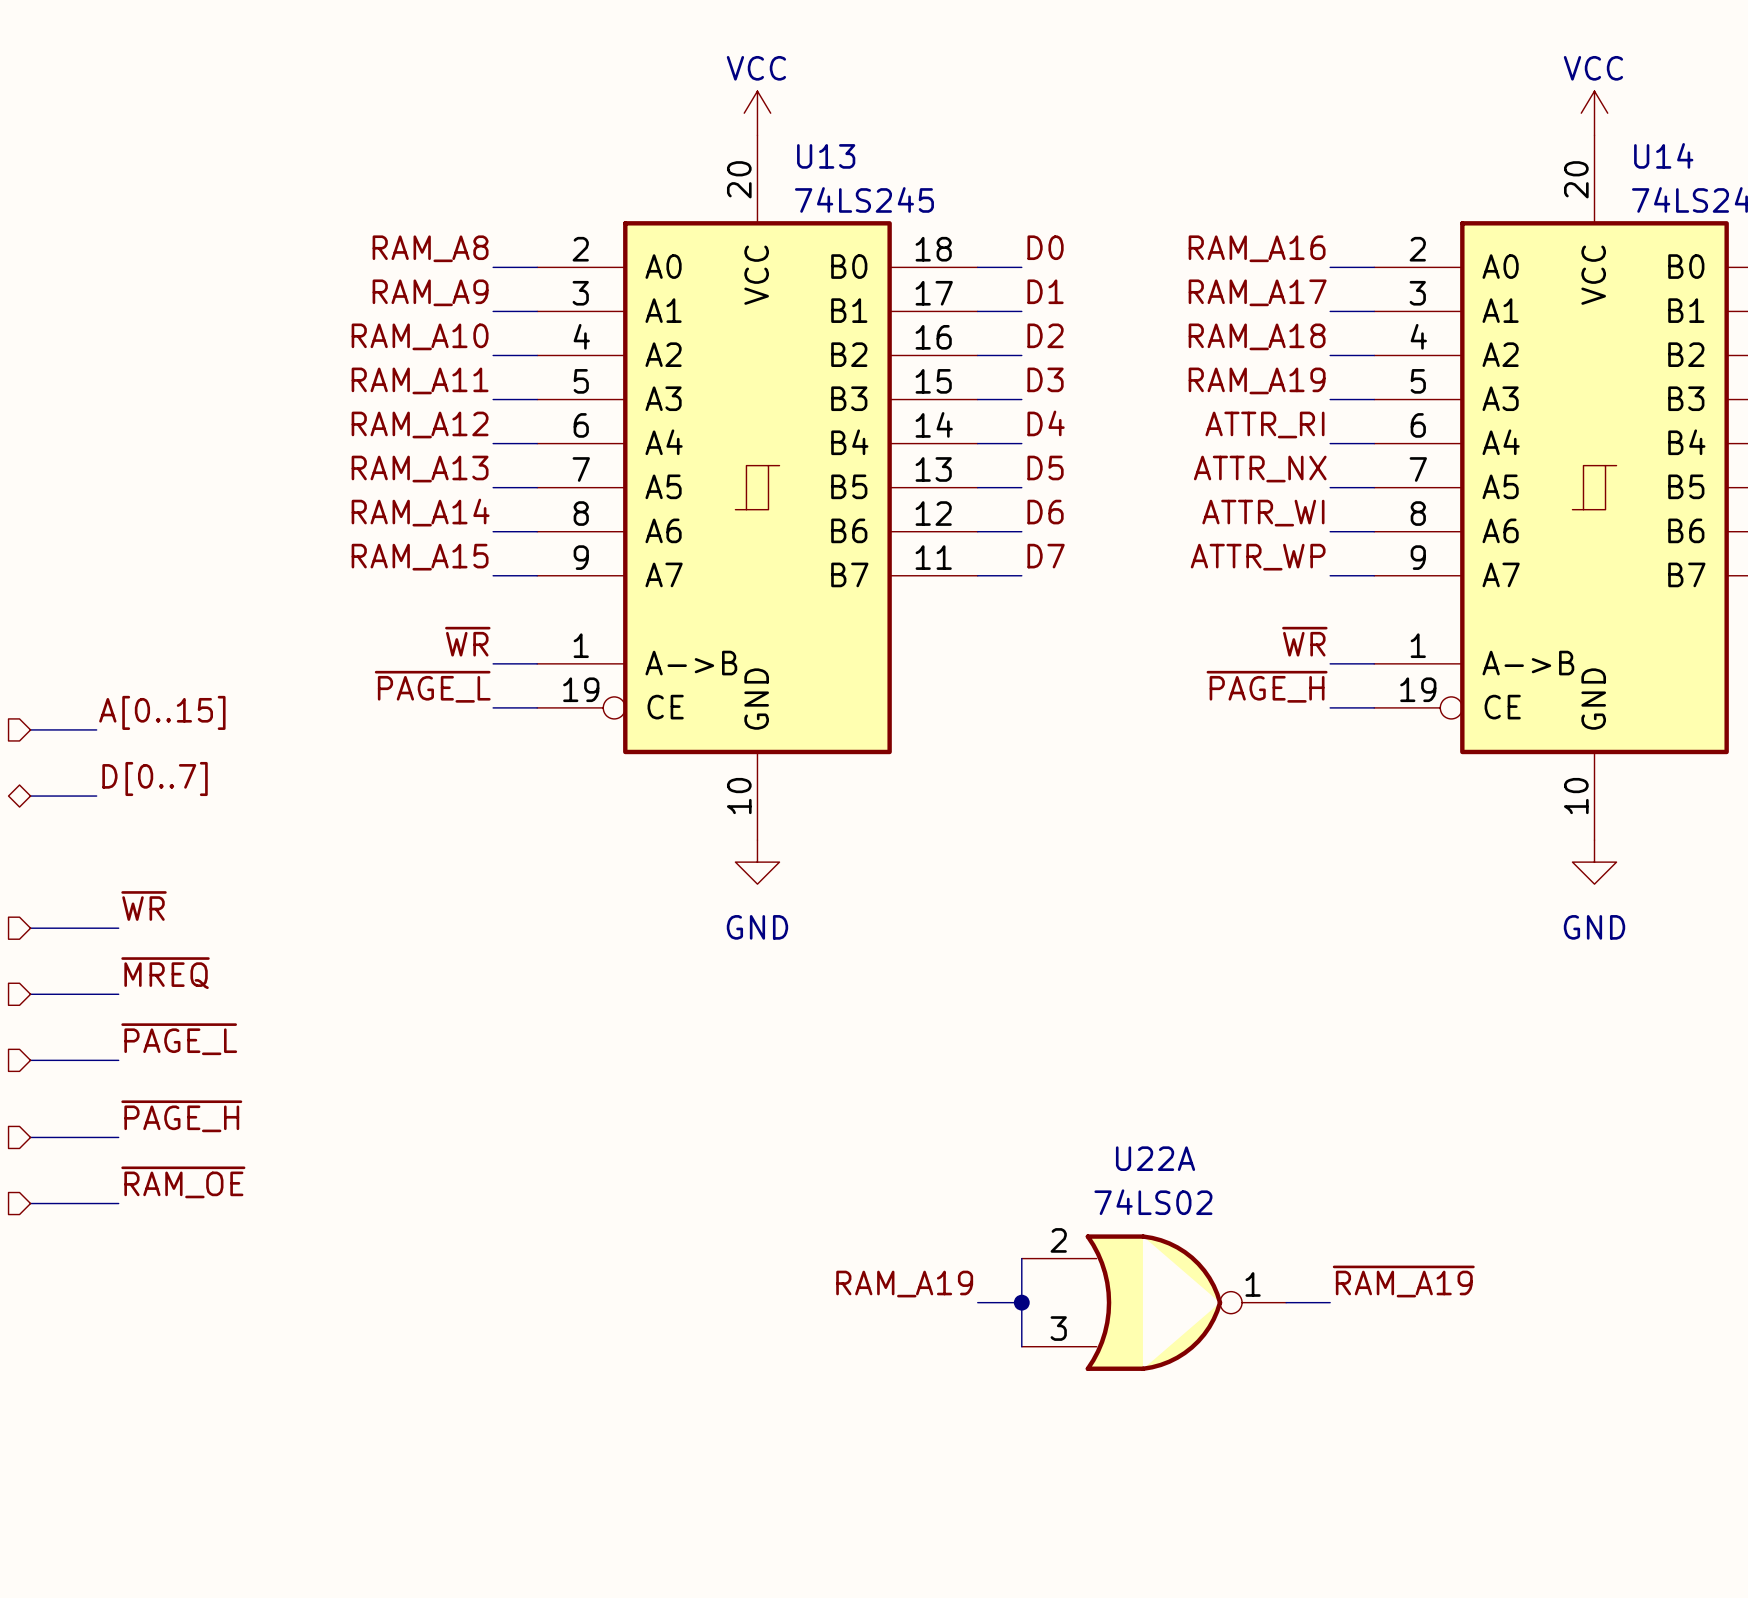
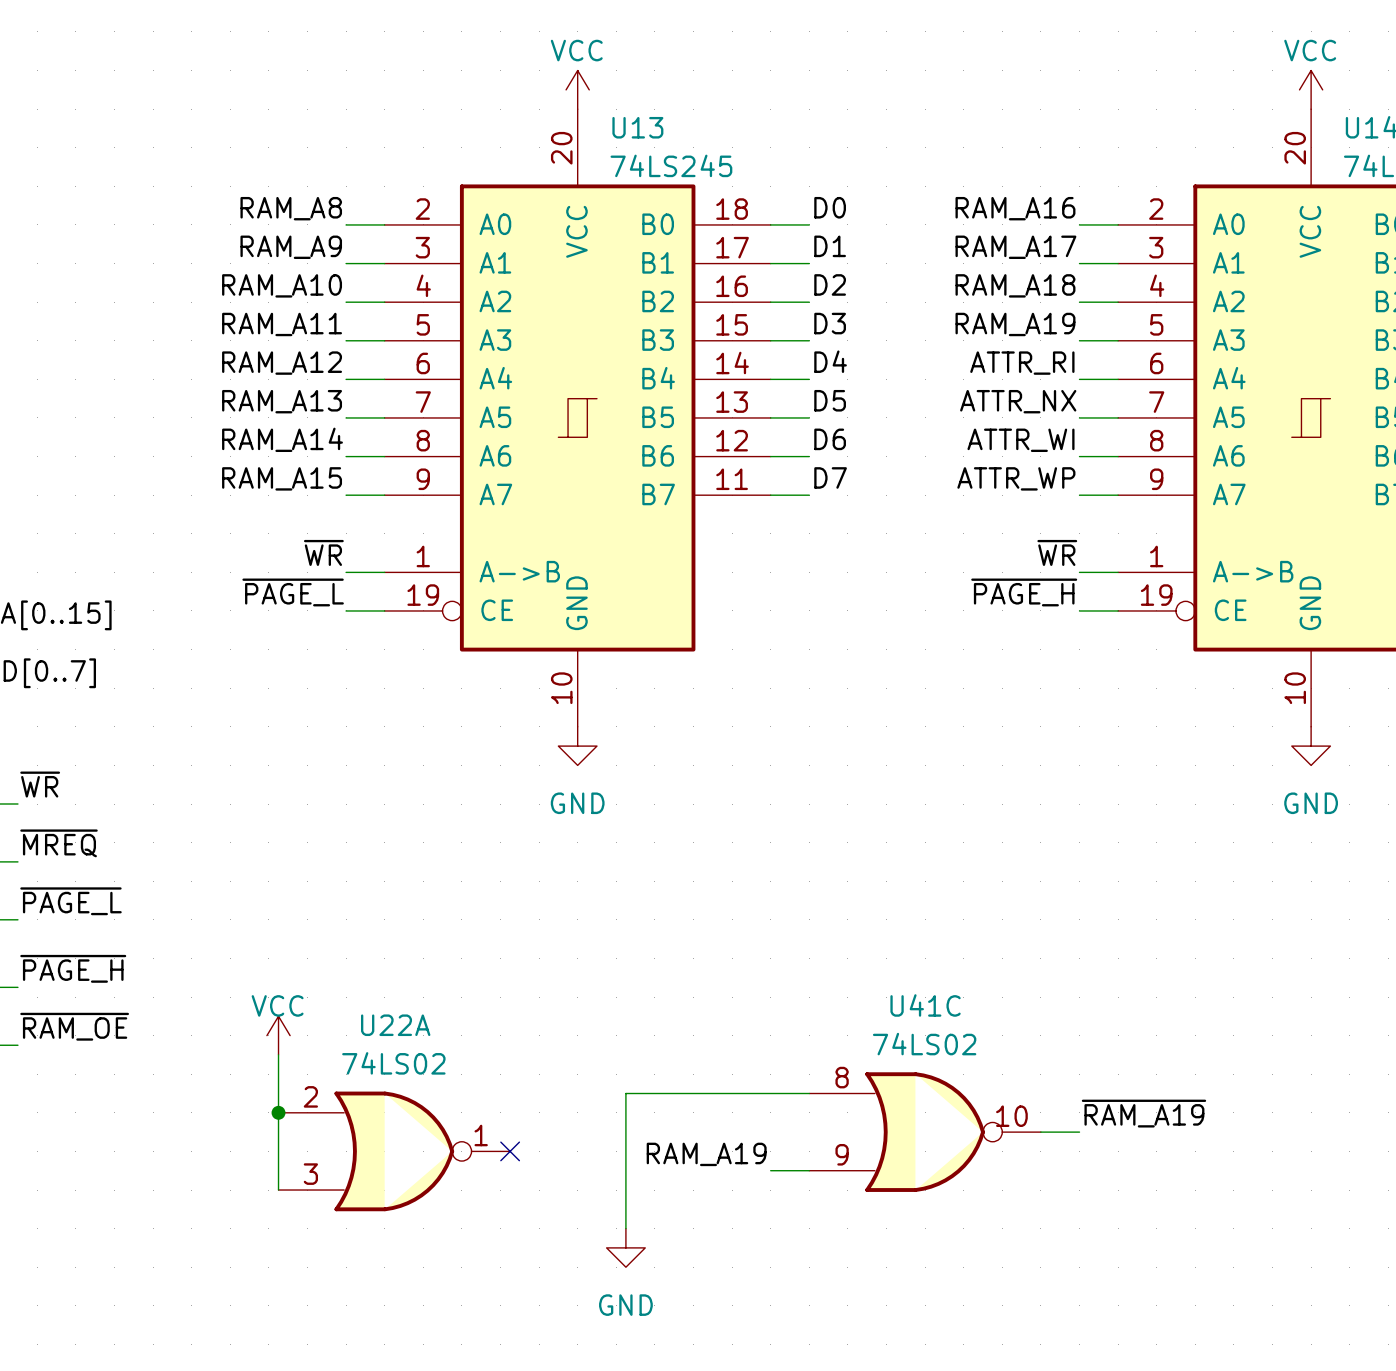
power symbol: none -> VCC (278, 1035)
wire: none -> (278, 1054) (278, 1190)
wire: (1021, 1258) (1021, 1346) -> (770, 1170) (809, 1170)
wire: none -> (809, 1093) (625, 1093) (625, 1228)
junction: none -> (278, 1112)
label position: RAM_A19 (904, 1284) -> RAM_A19 (706, 1154)
wire: (977, 1302) (1021, 1302) -> none
junction: (1021, 1302) -> none
U22A position: (1153, 1302) -> (394, 1151)
U41C: none -> 74LS02 (925, 1132)
no-connect mark: none -> (510, 1151)
power symbol: none -> GND (625, 1247)

